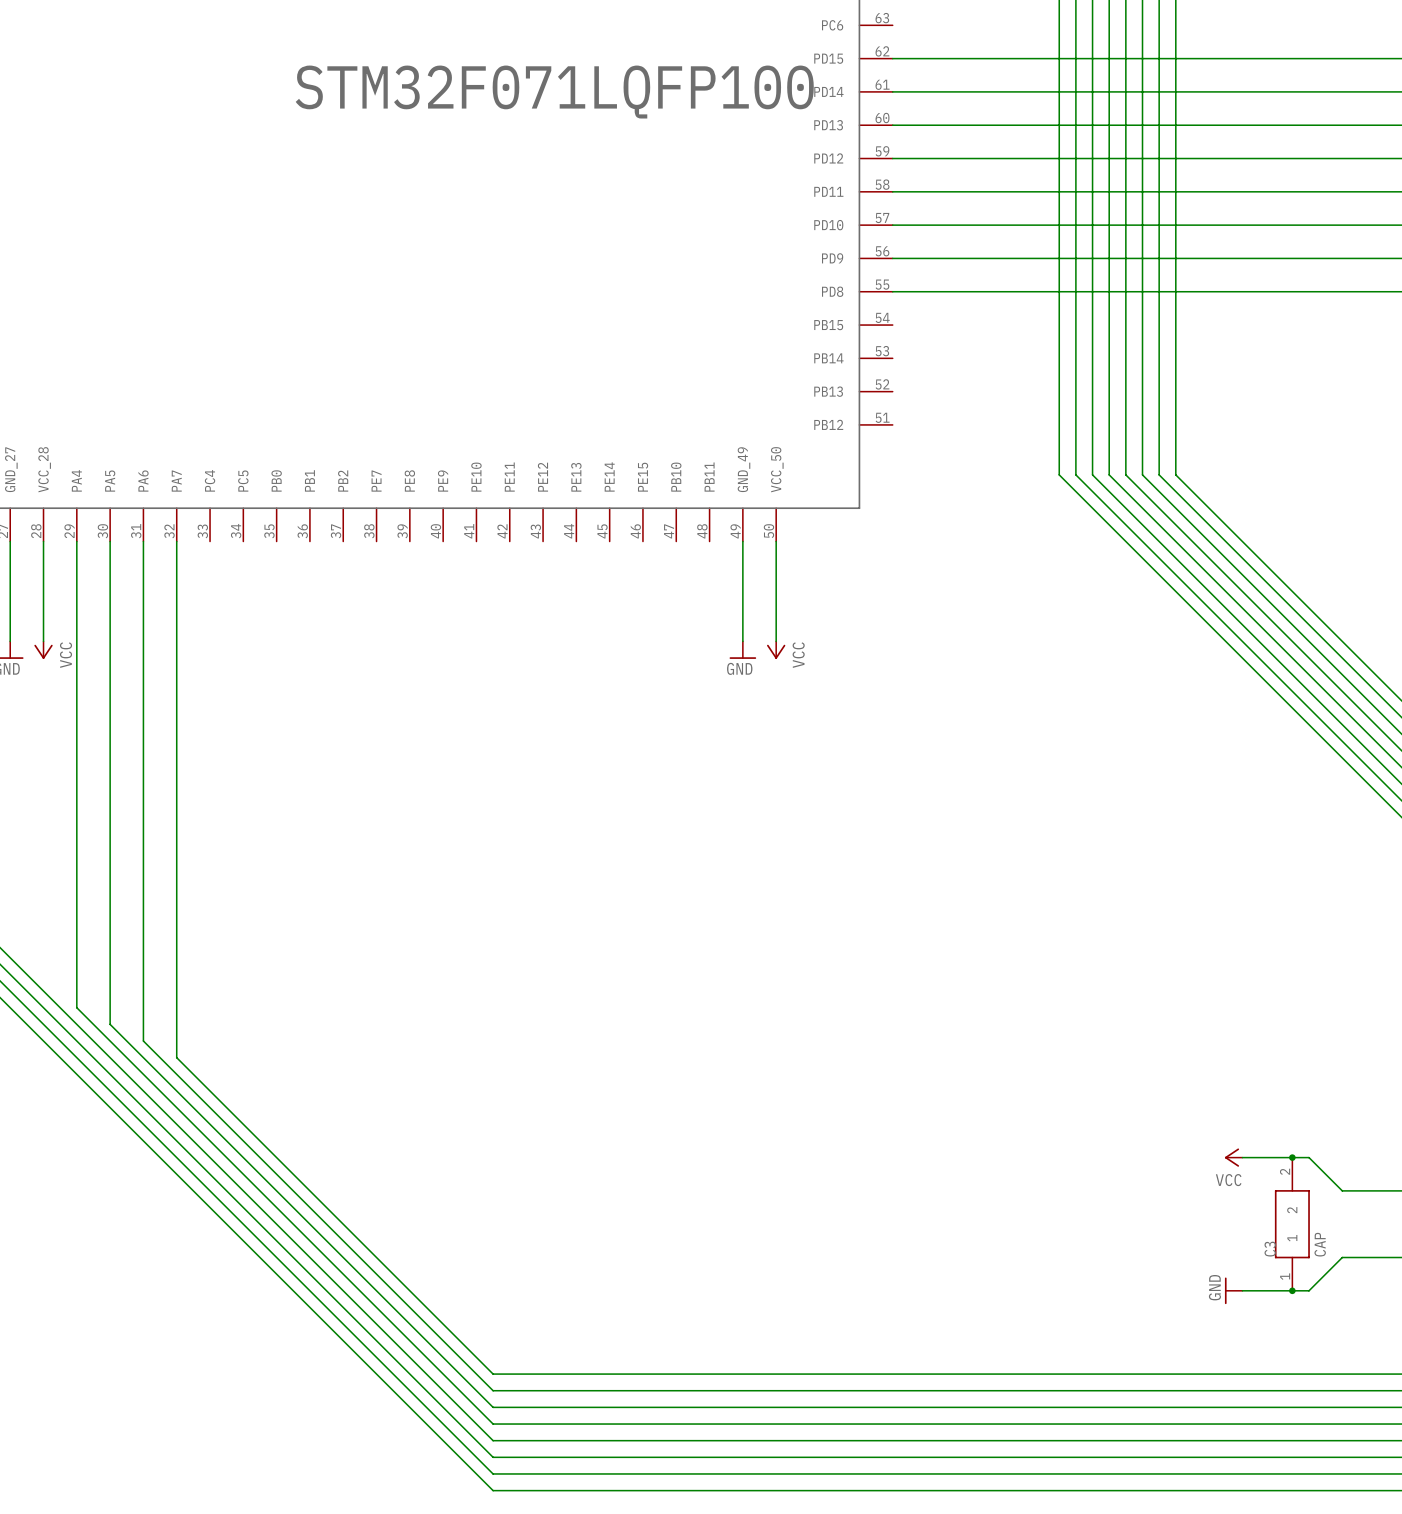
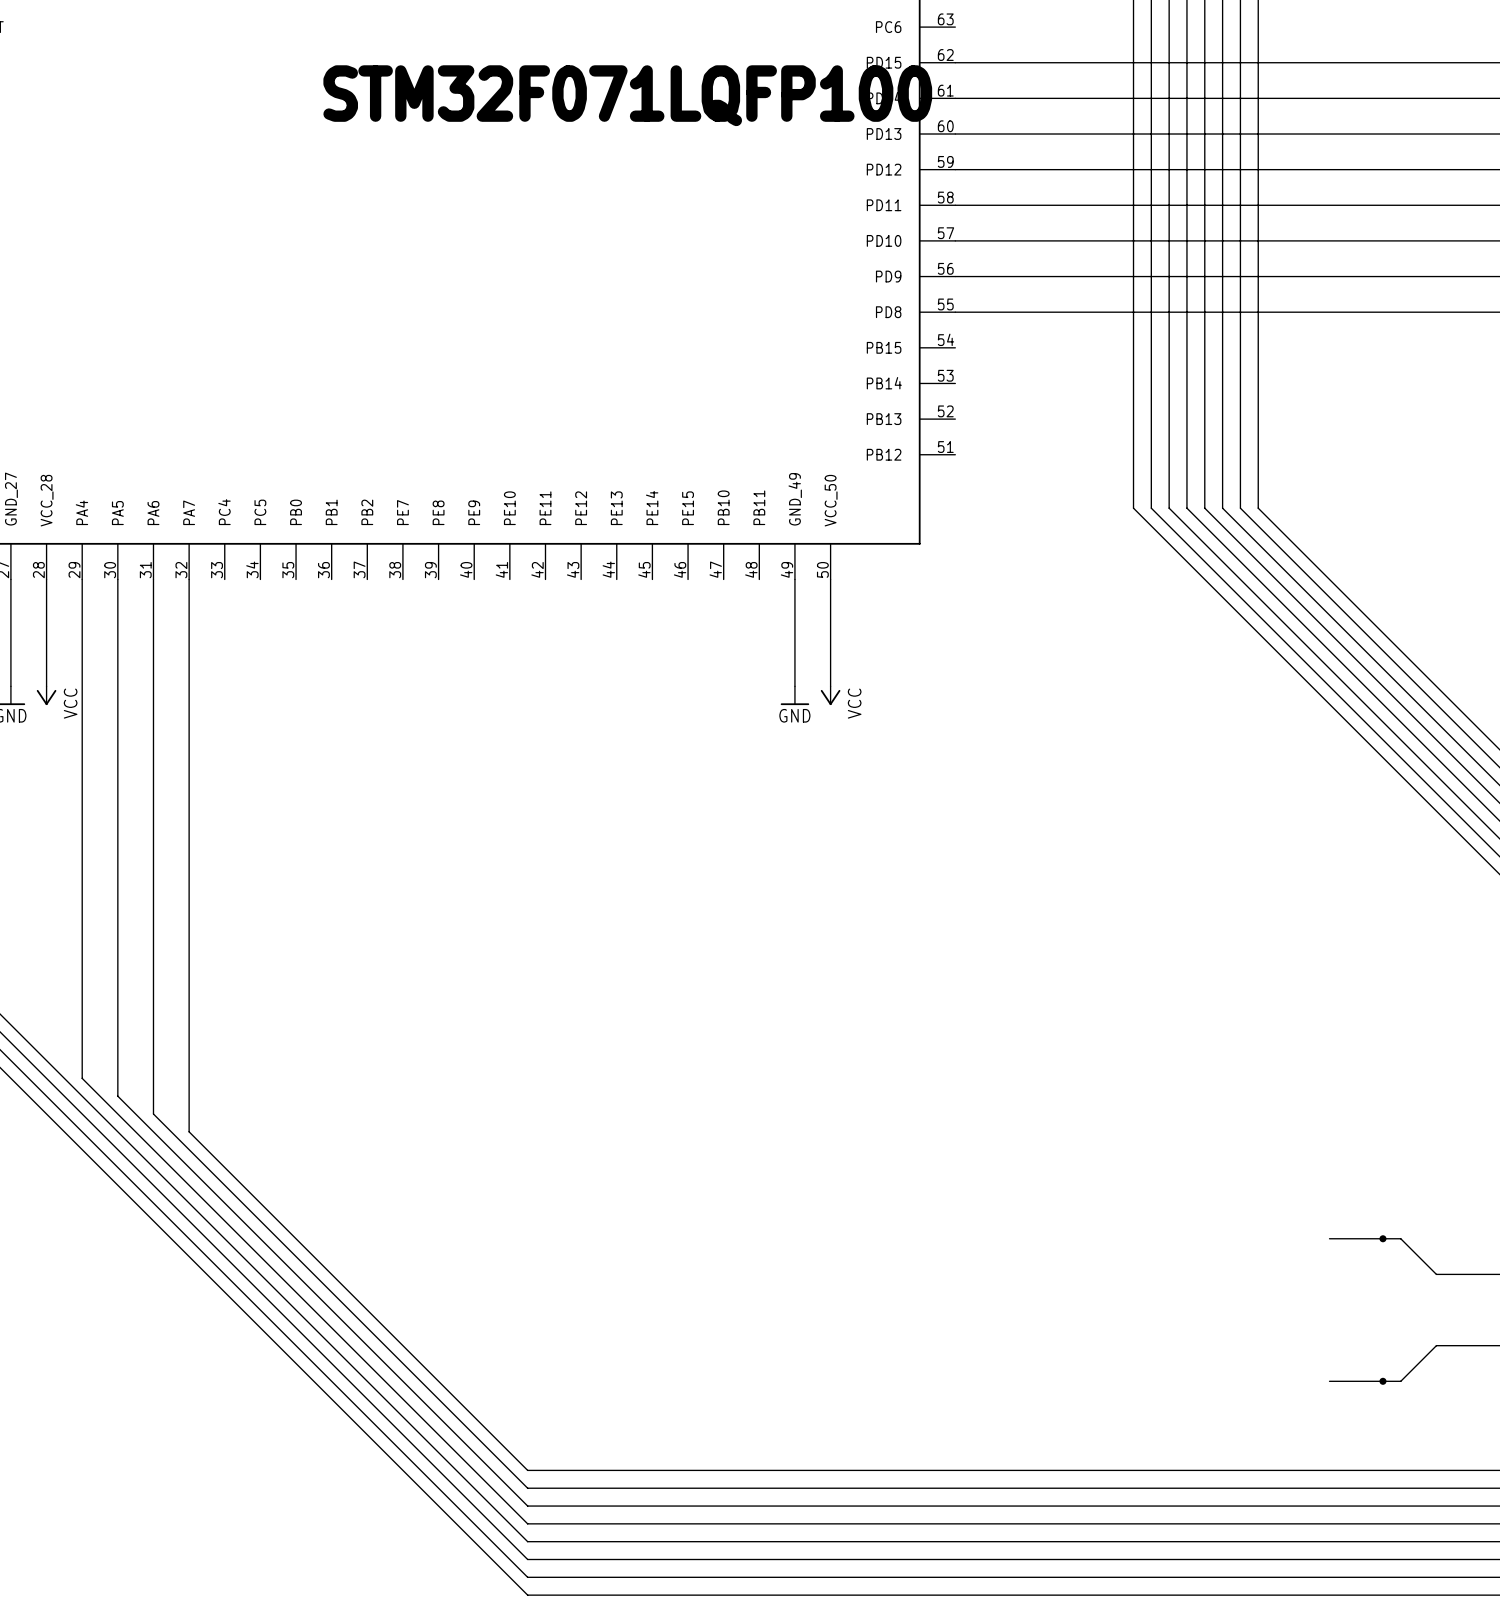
power symbol: VCC (1233, 1157) -> none
C3: CAP (1292, 1224) -> none
power symbol: GND (1233, 1290) -> none

